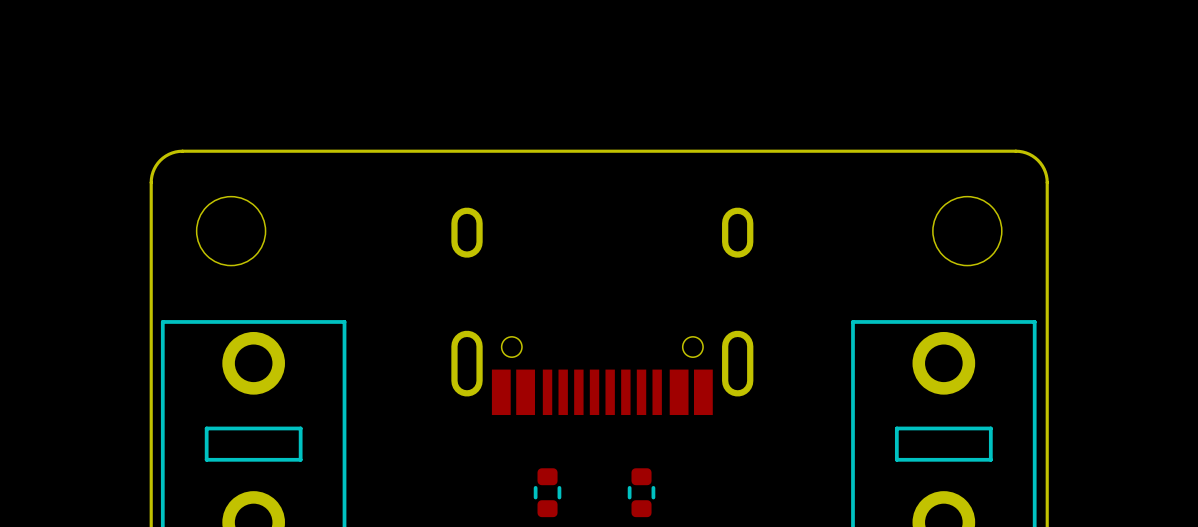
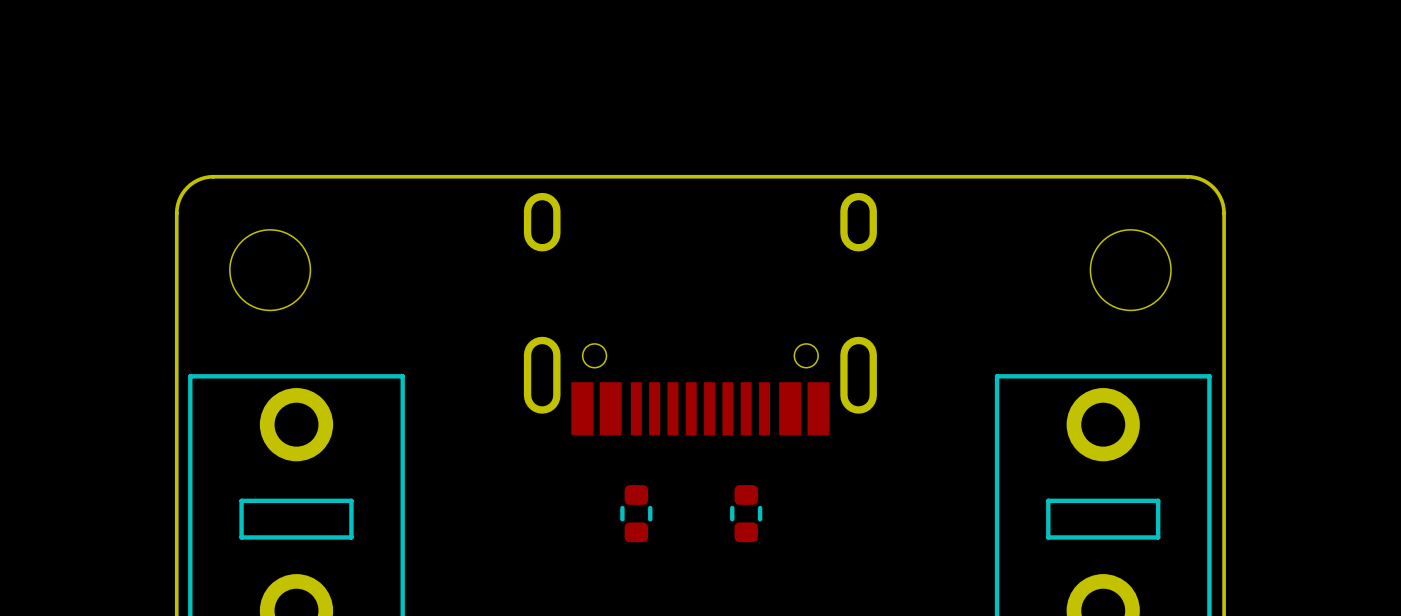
part position: (602, 311) -> (700, 314)
part: none -> (636, 513)
part: none -> (746, 513)
part: (547, 492) -> none
part: (641, 492) -> none

